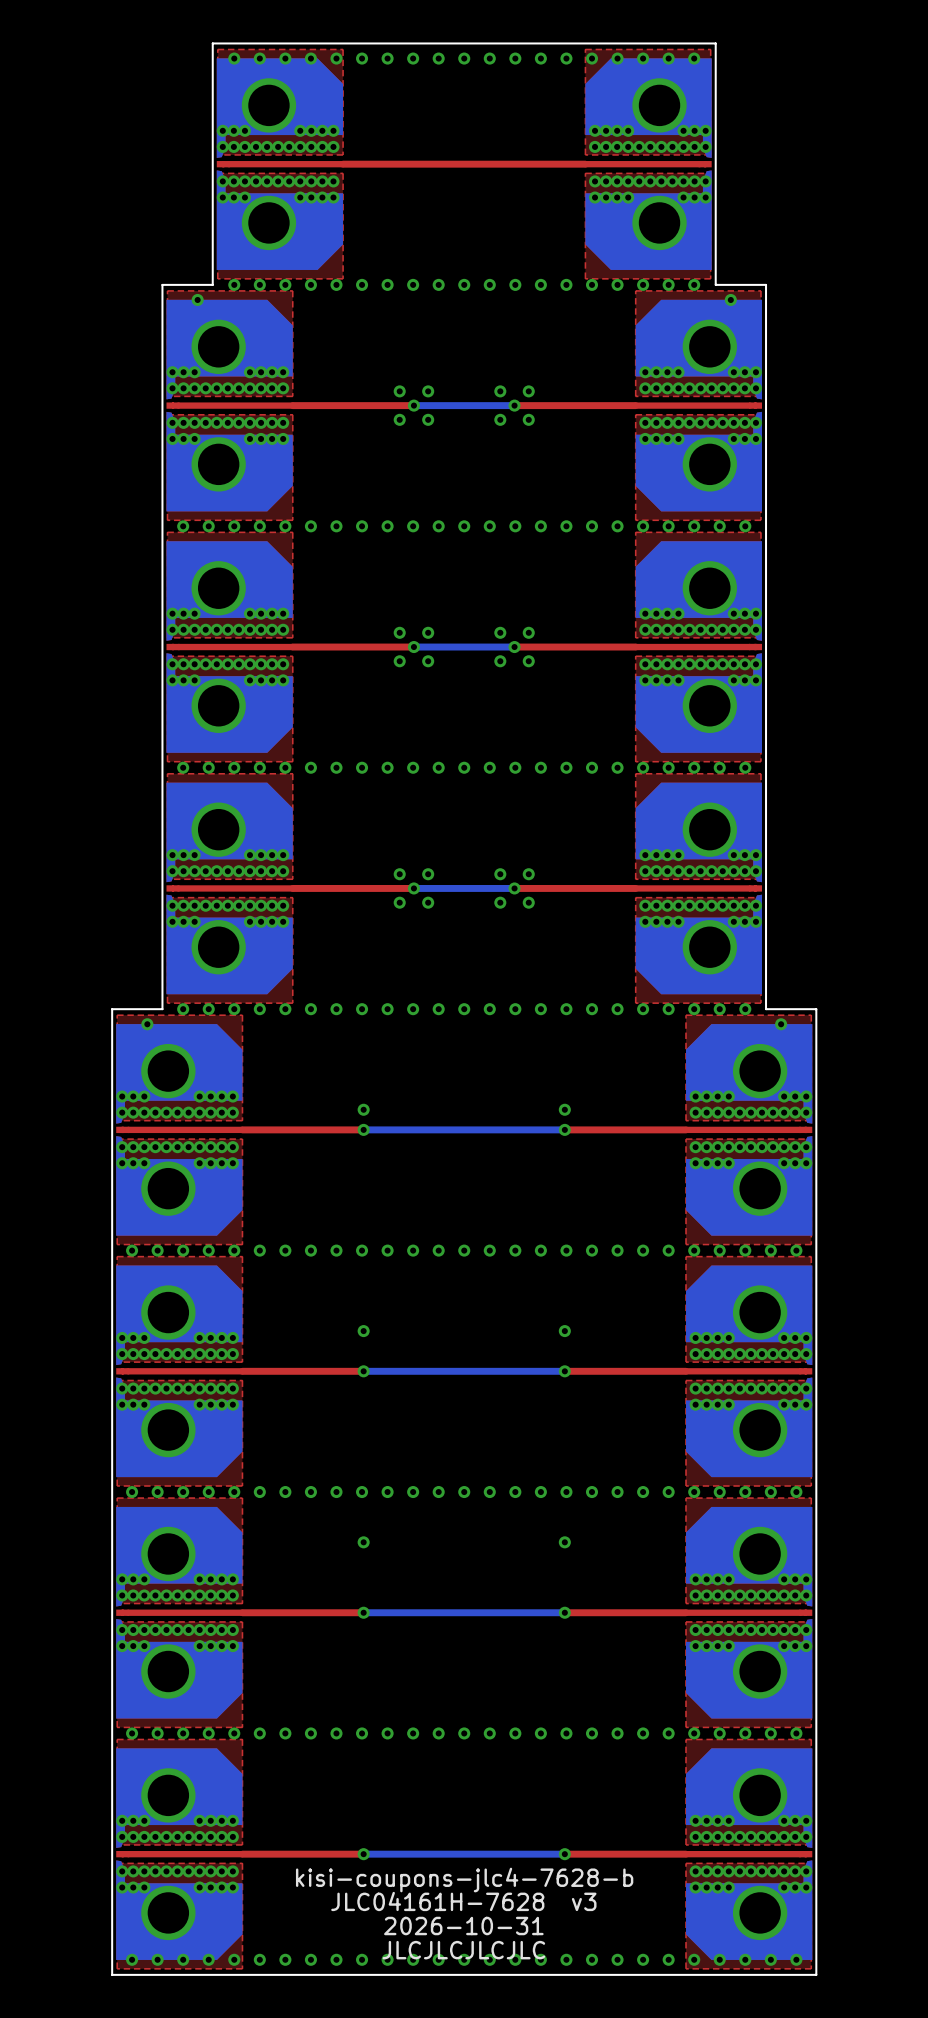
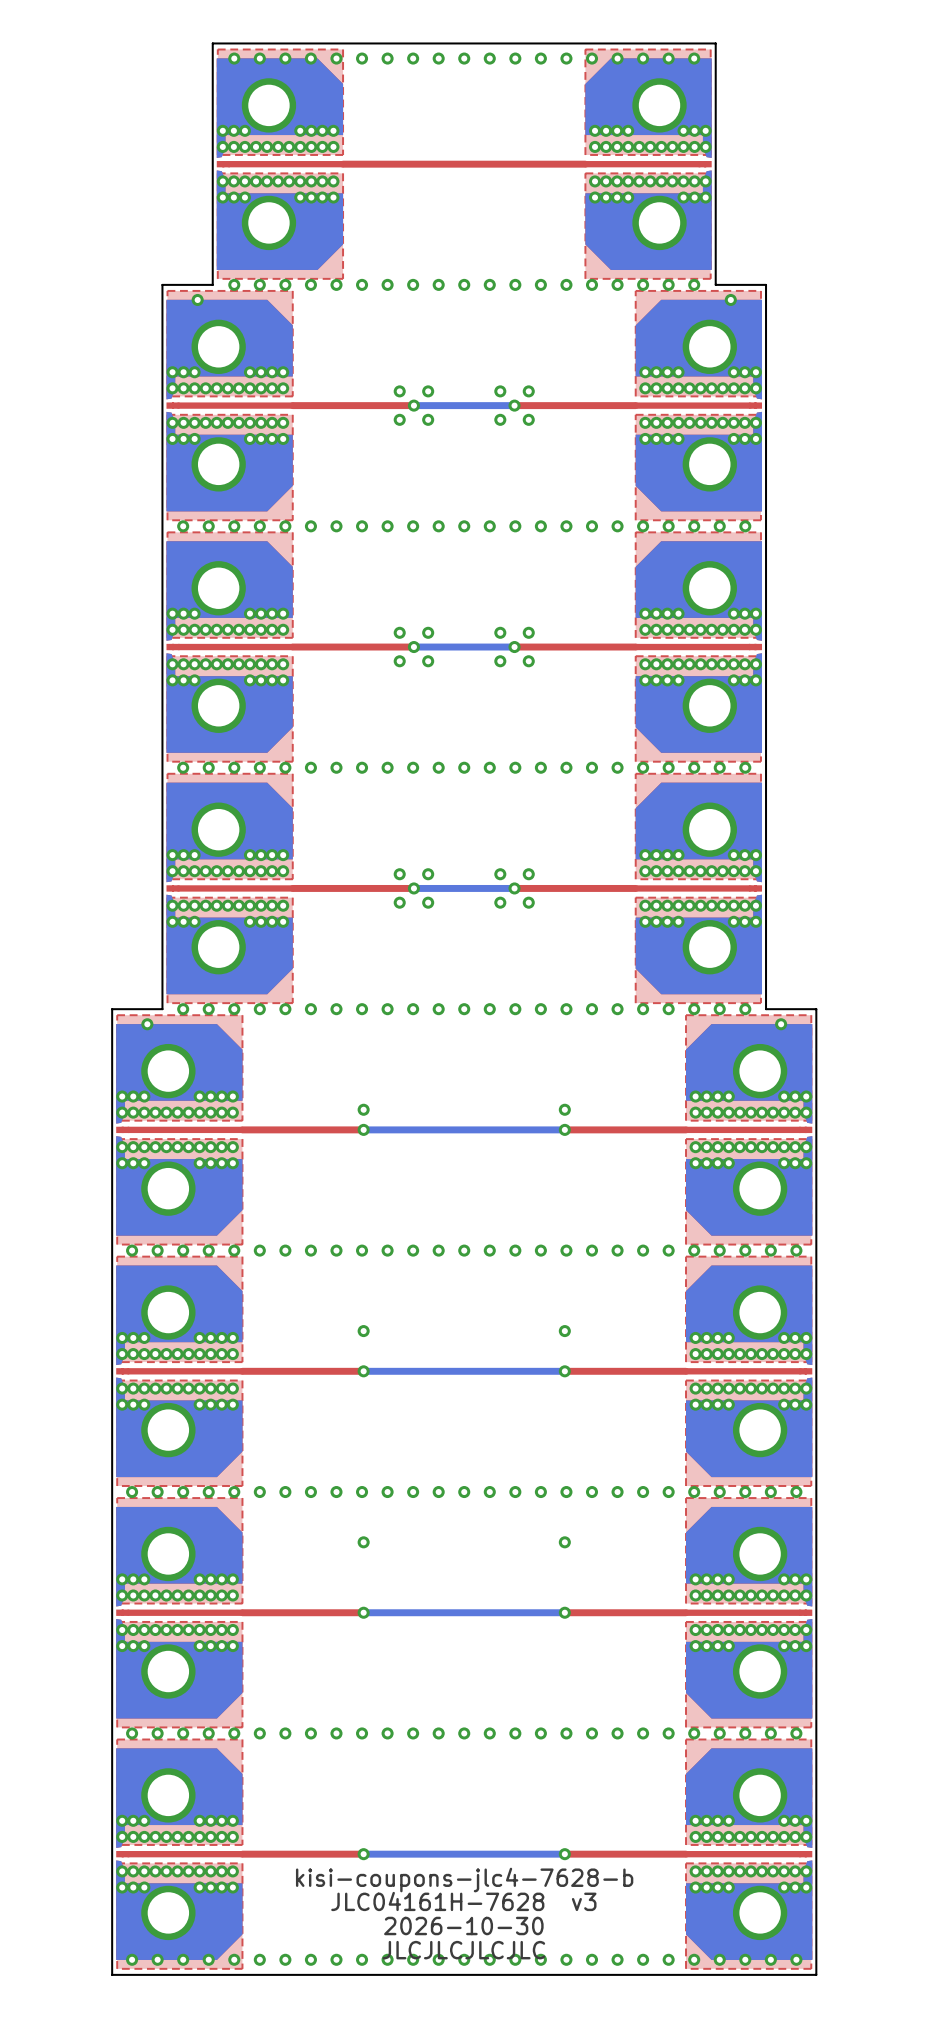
text: 2026-10-31 (463, 1925) -> 2026-10-30 (463, 1925)

